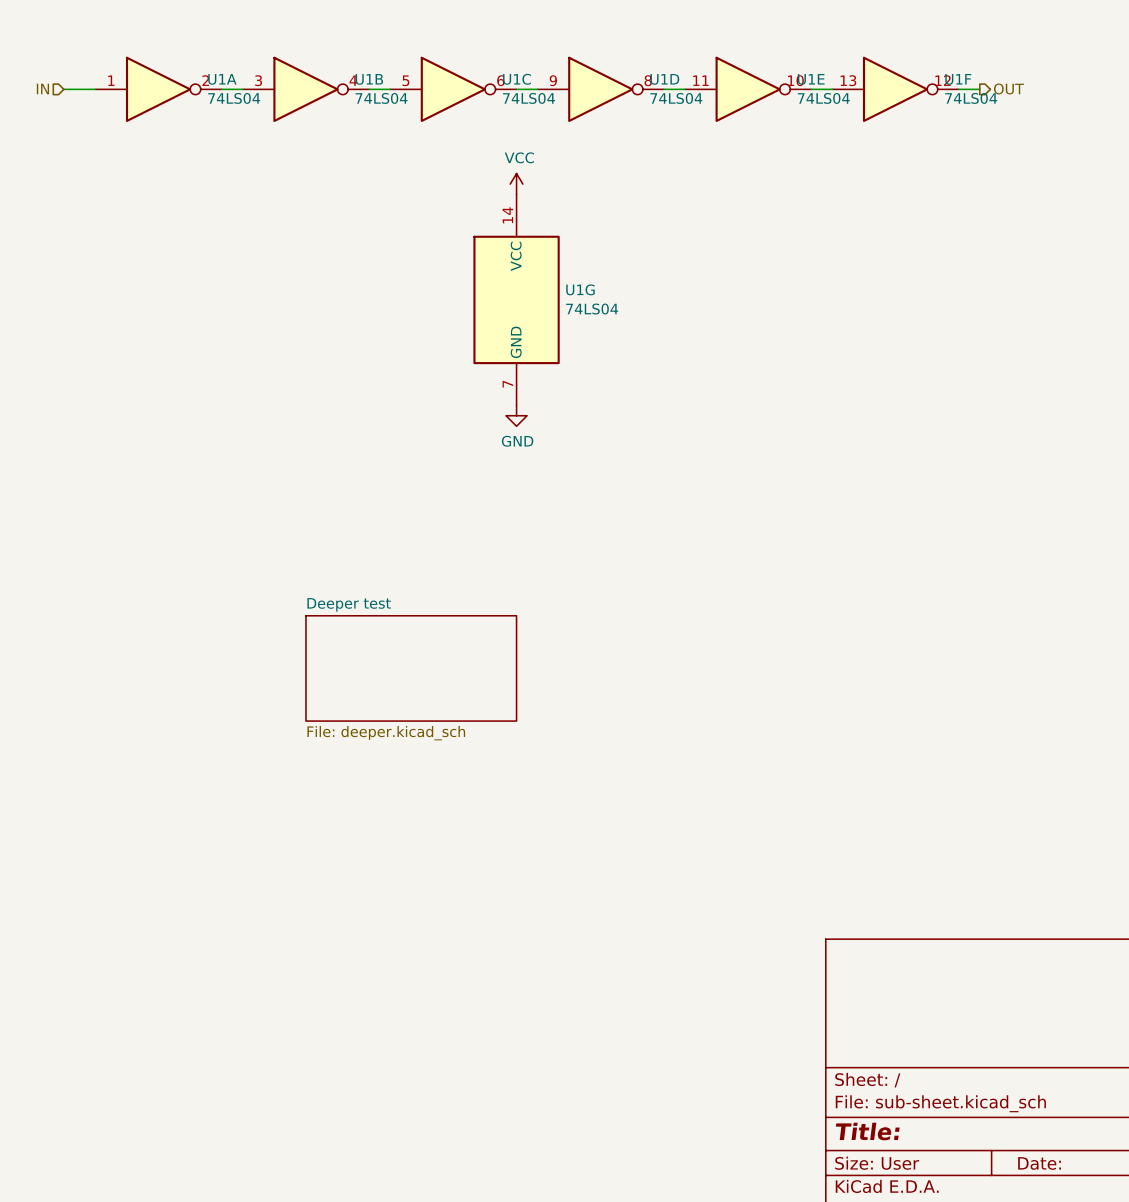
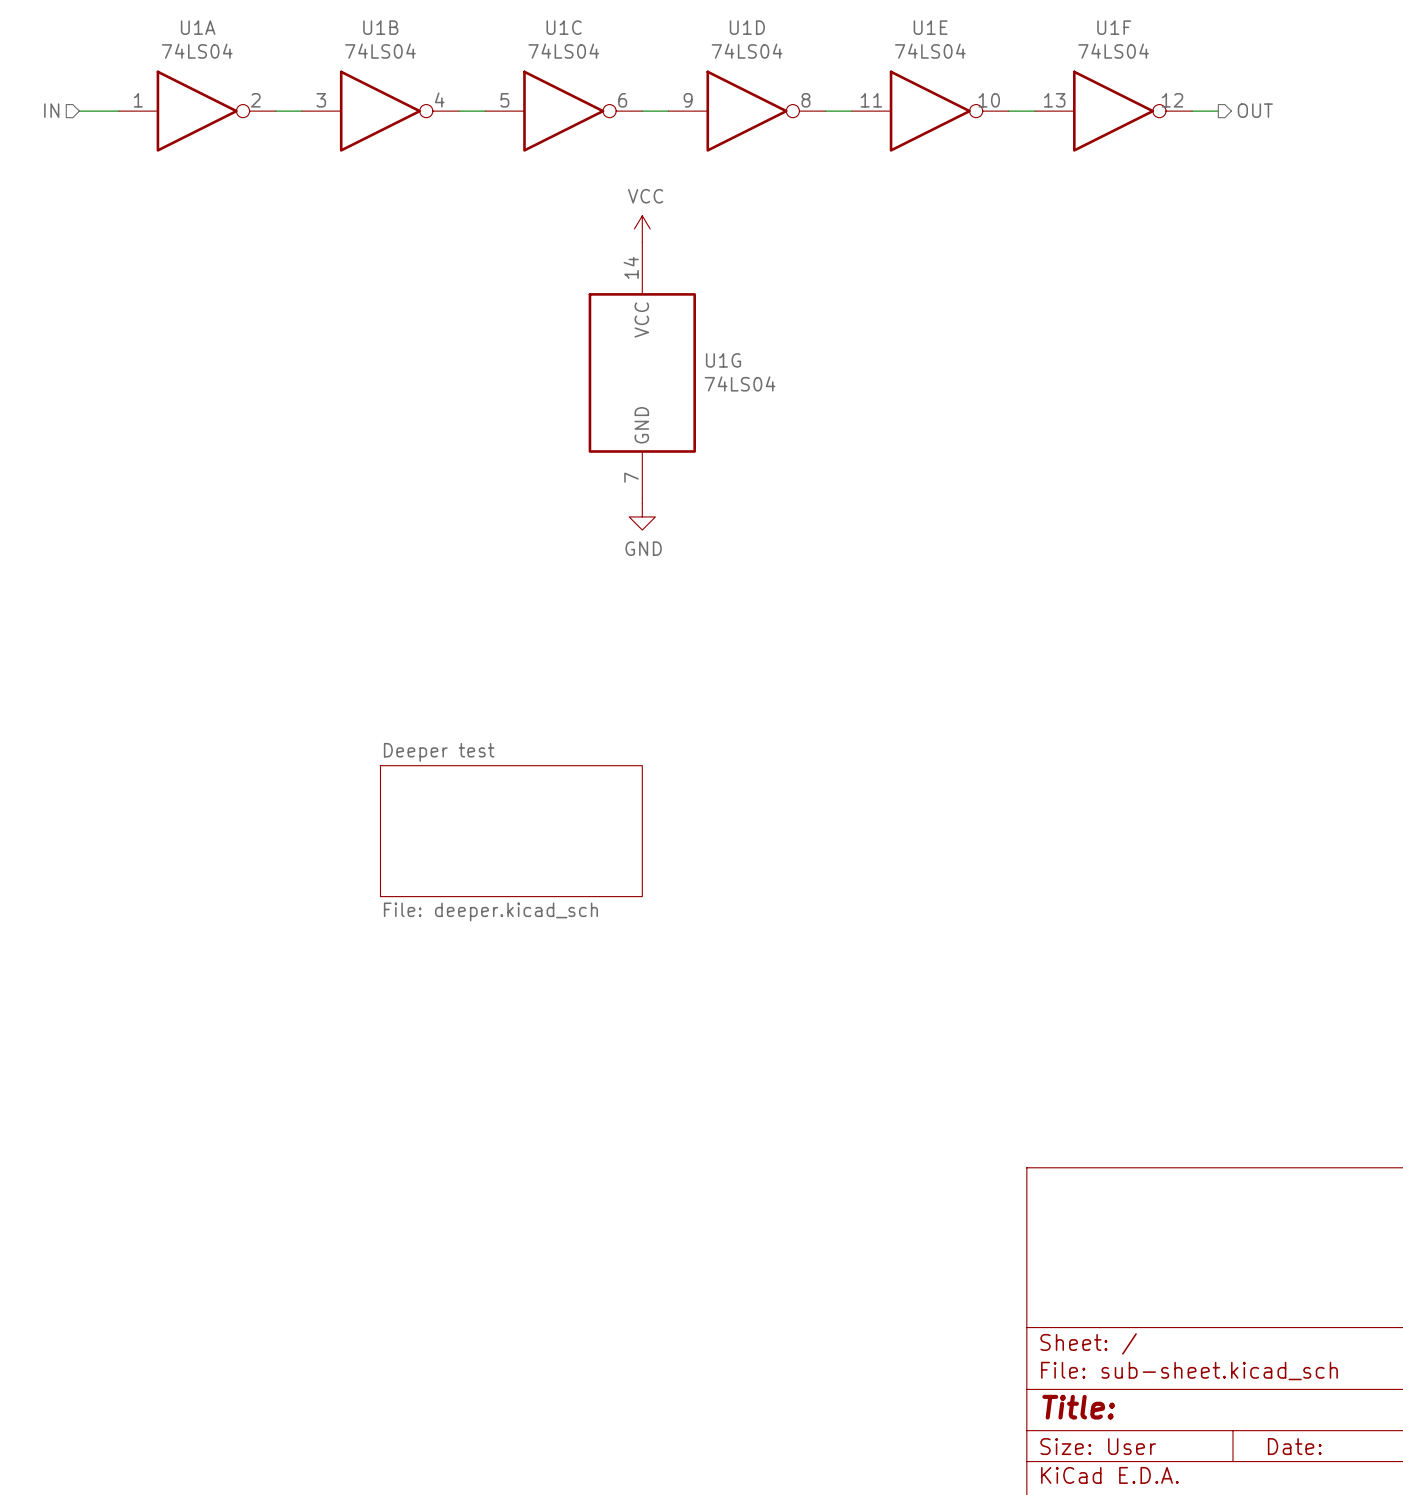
U1A name position: U1A (222, 79) -> U1A (198, 27)
U1B name position: U1B (369, 79) -> U1B (380, 27)
U1C name position: U1C (516, 79) -> U1C (564, 27)
U1D name position: U1D (664, 79) -> U1D (747, 27)
U1E name position: U1E (811, 79) -> U1E (930, 27)
U1F name position: U1F (958, 79) -> U1F (1114, 27)
U1A value position: 74LS04 (234, 98) -> 74LS04 (197, 51)
U1B value position: 74LS04 (381, 98) -> 74LS04 (380, 51)
U1C value position: 74LS04 (528, 98) -> 74LS04 (563, 51)
U1D value position: 74LS04 (676, 98) -> 74LS04 (747, 51)
U1E value position: 74LS04 (823, 98) -> 74LS04 (930, 51)
U1F value position: 74LS04 (971, 98) -> 74LS04 (1113, 51)

